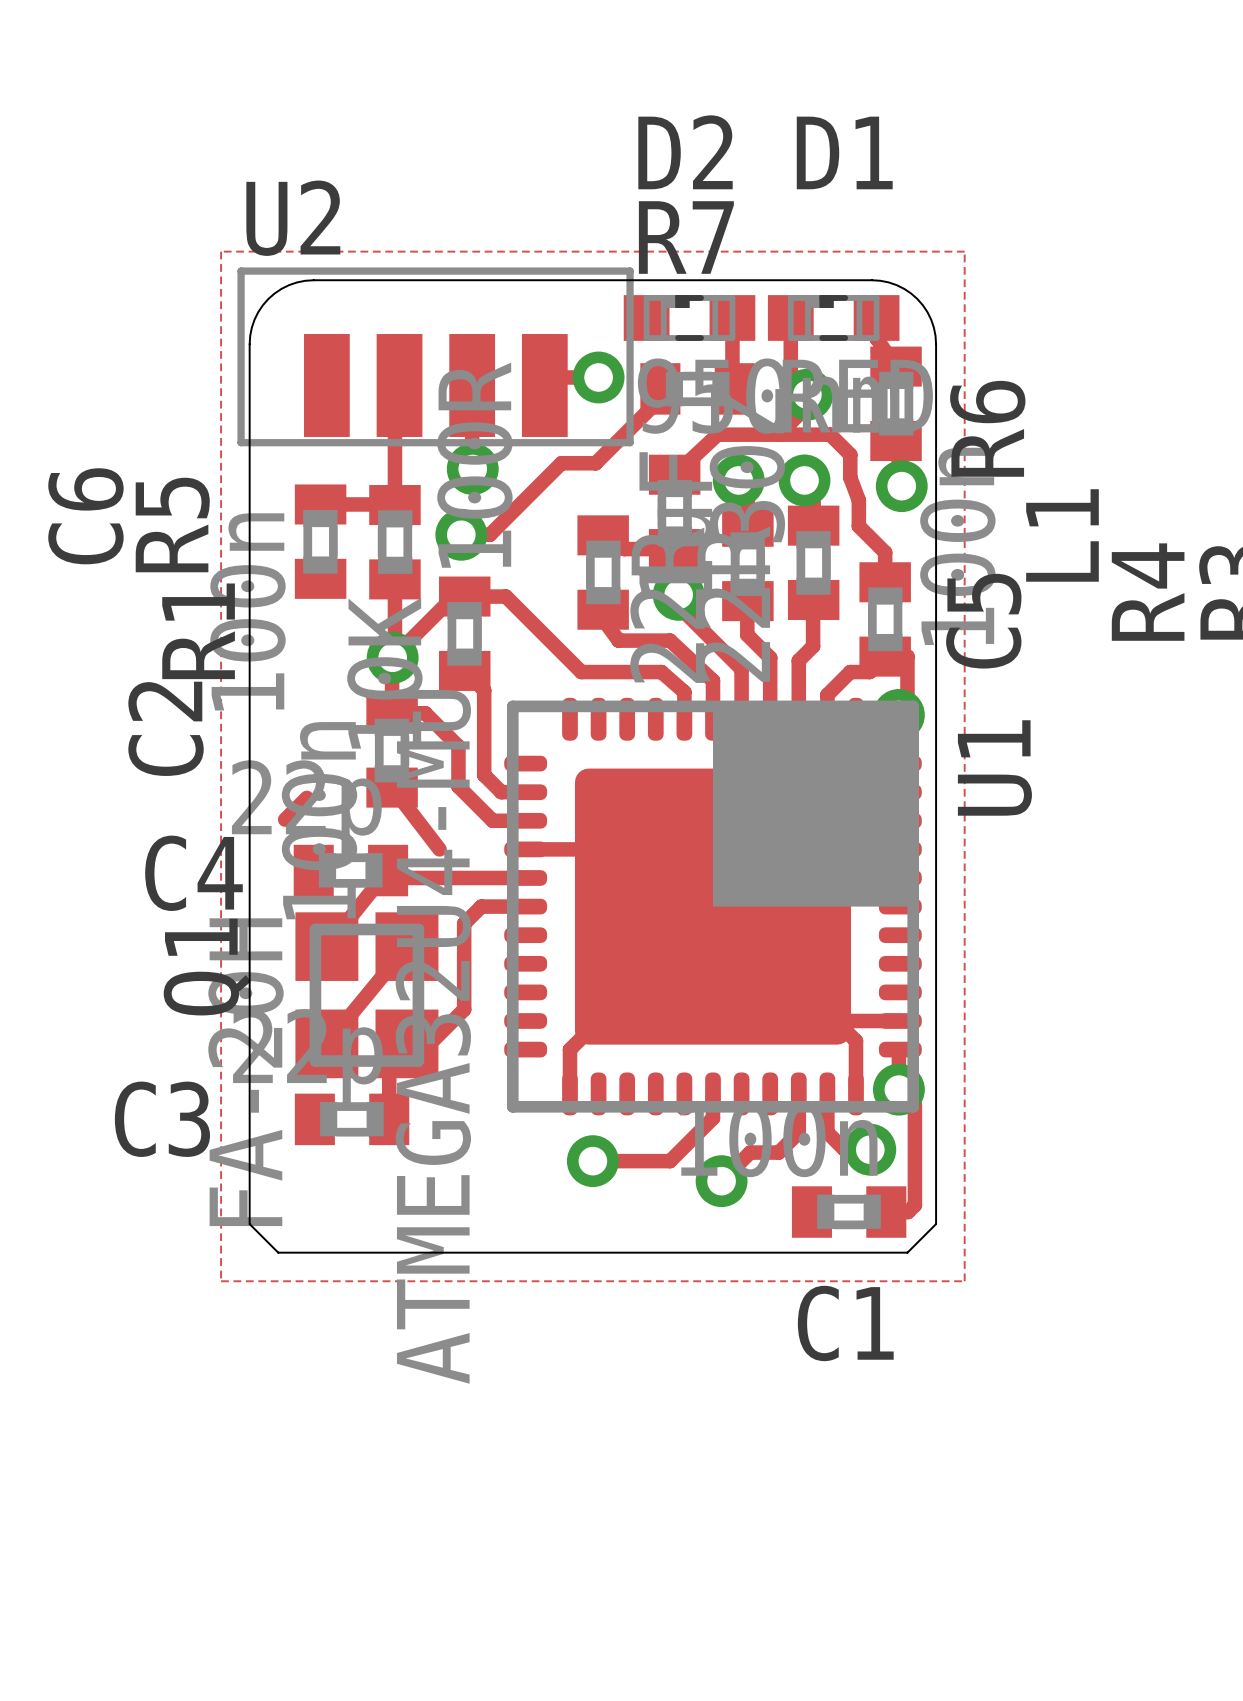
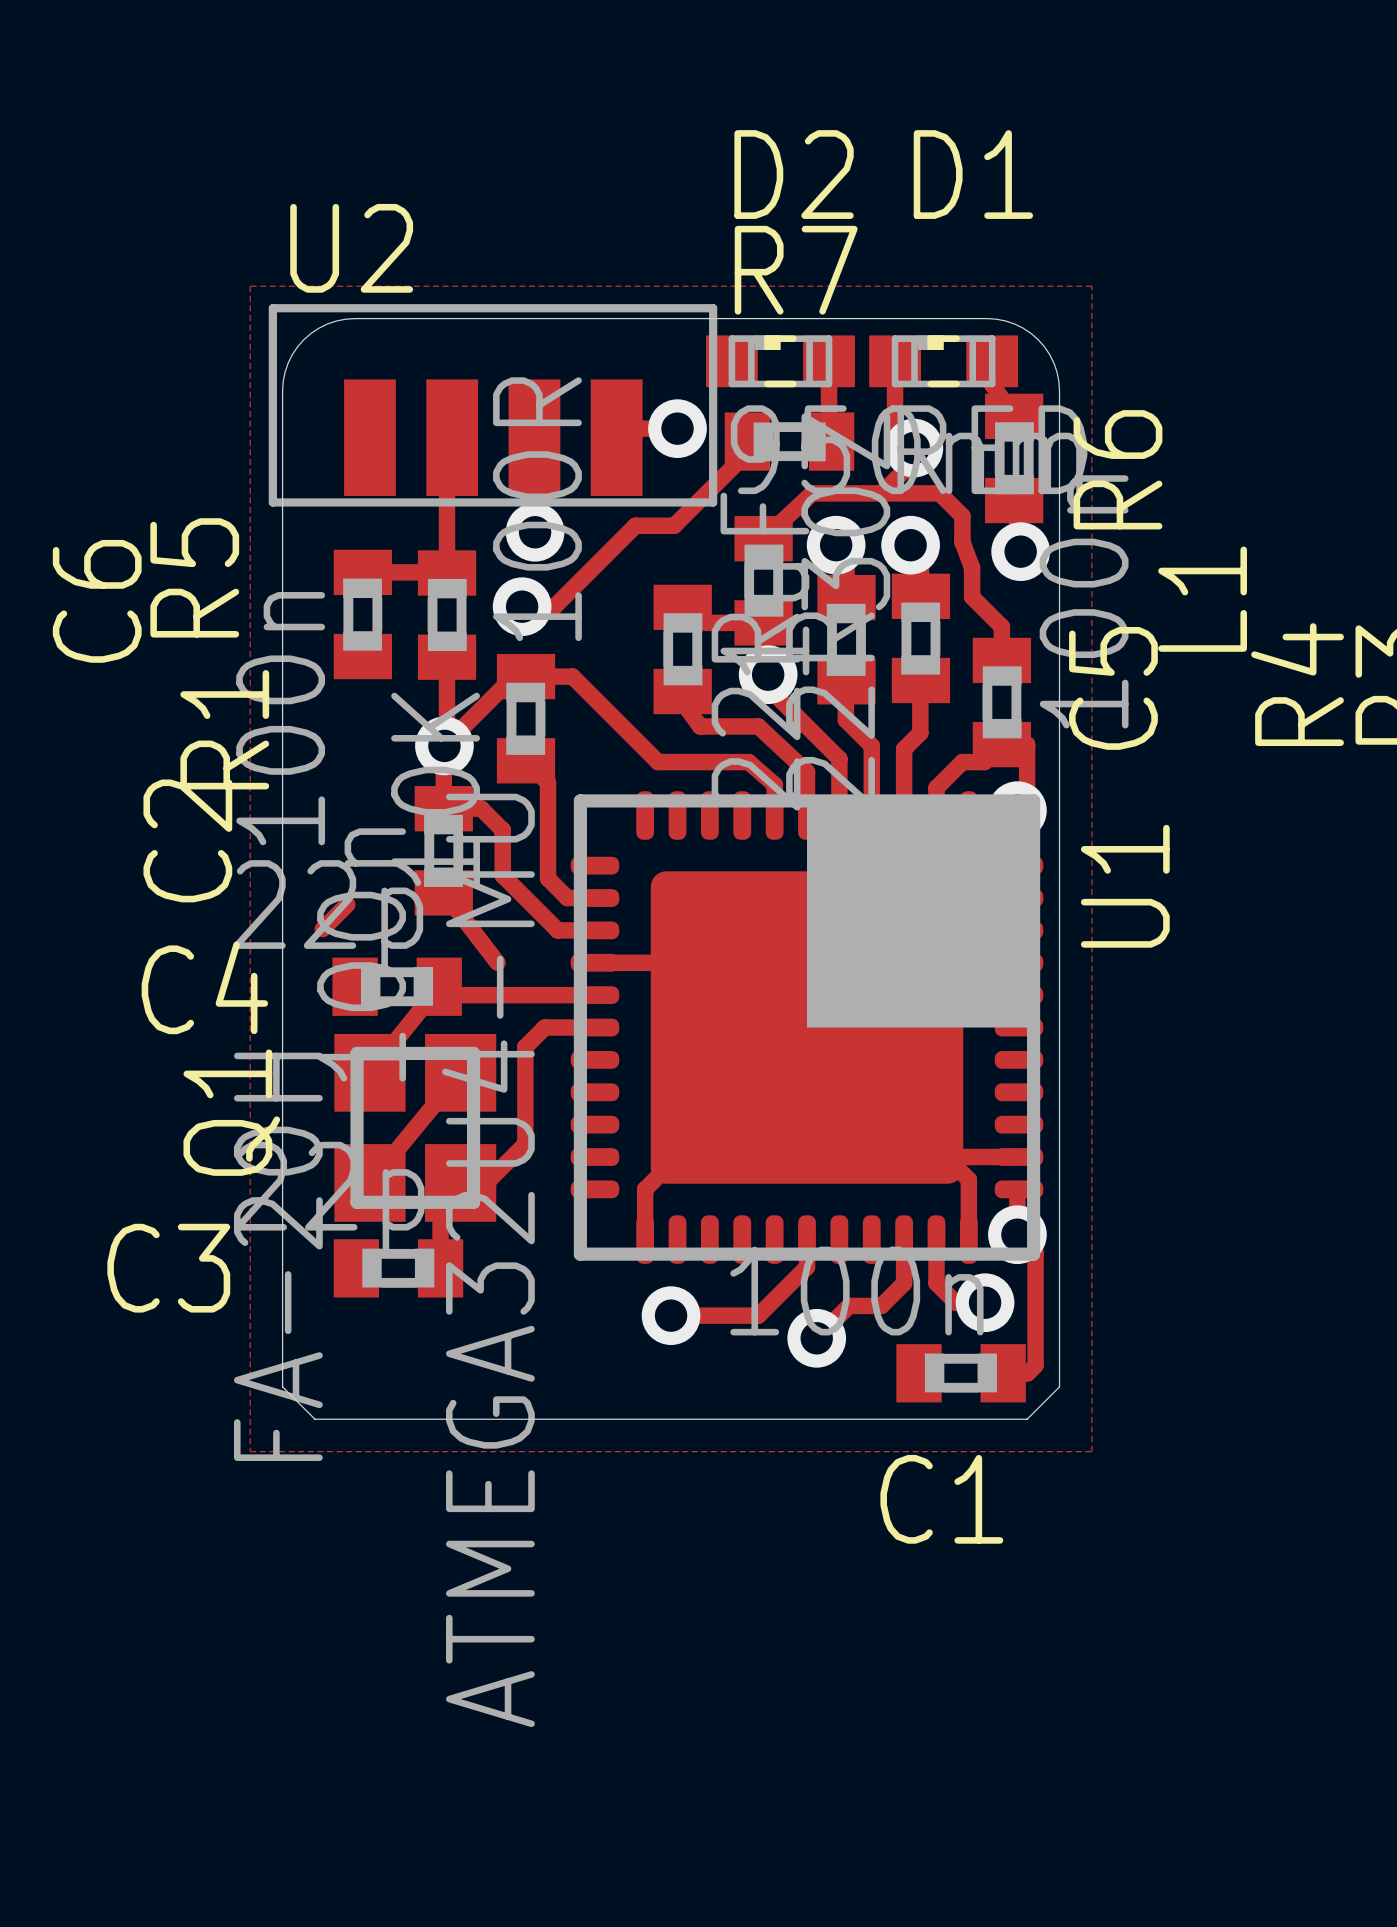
track: (444, 732) (458, 746) (458, 786) -> (502, 830) (502, 875) (518, 891)

